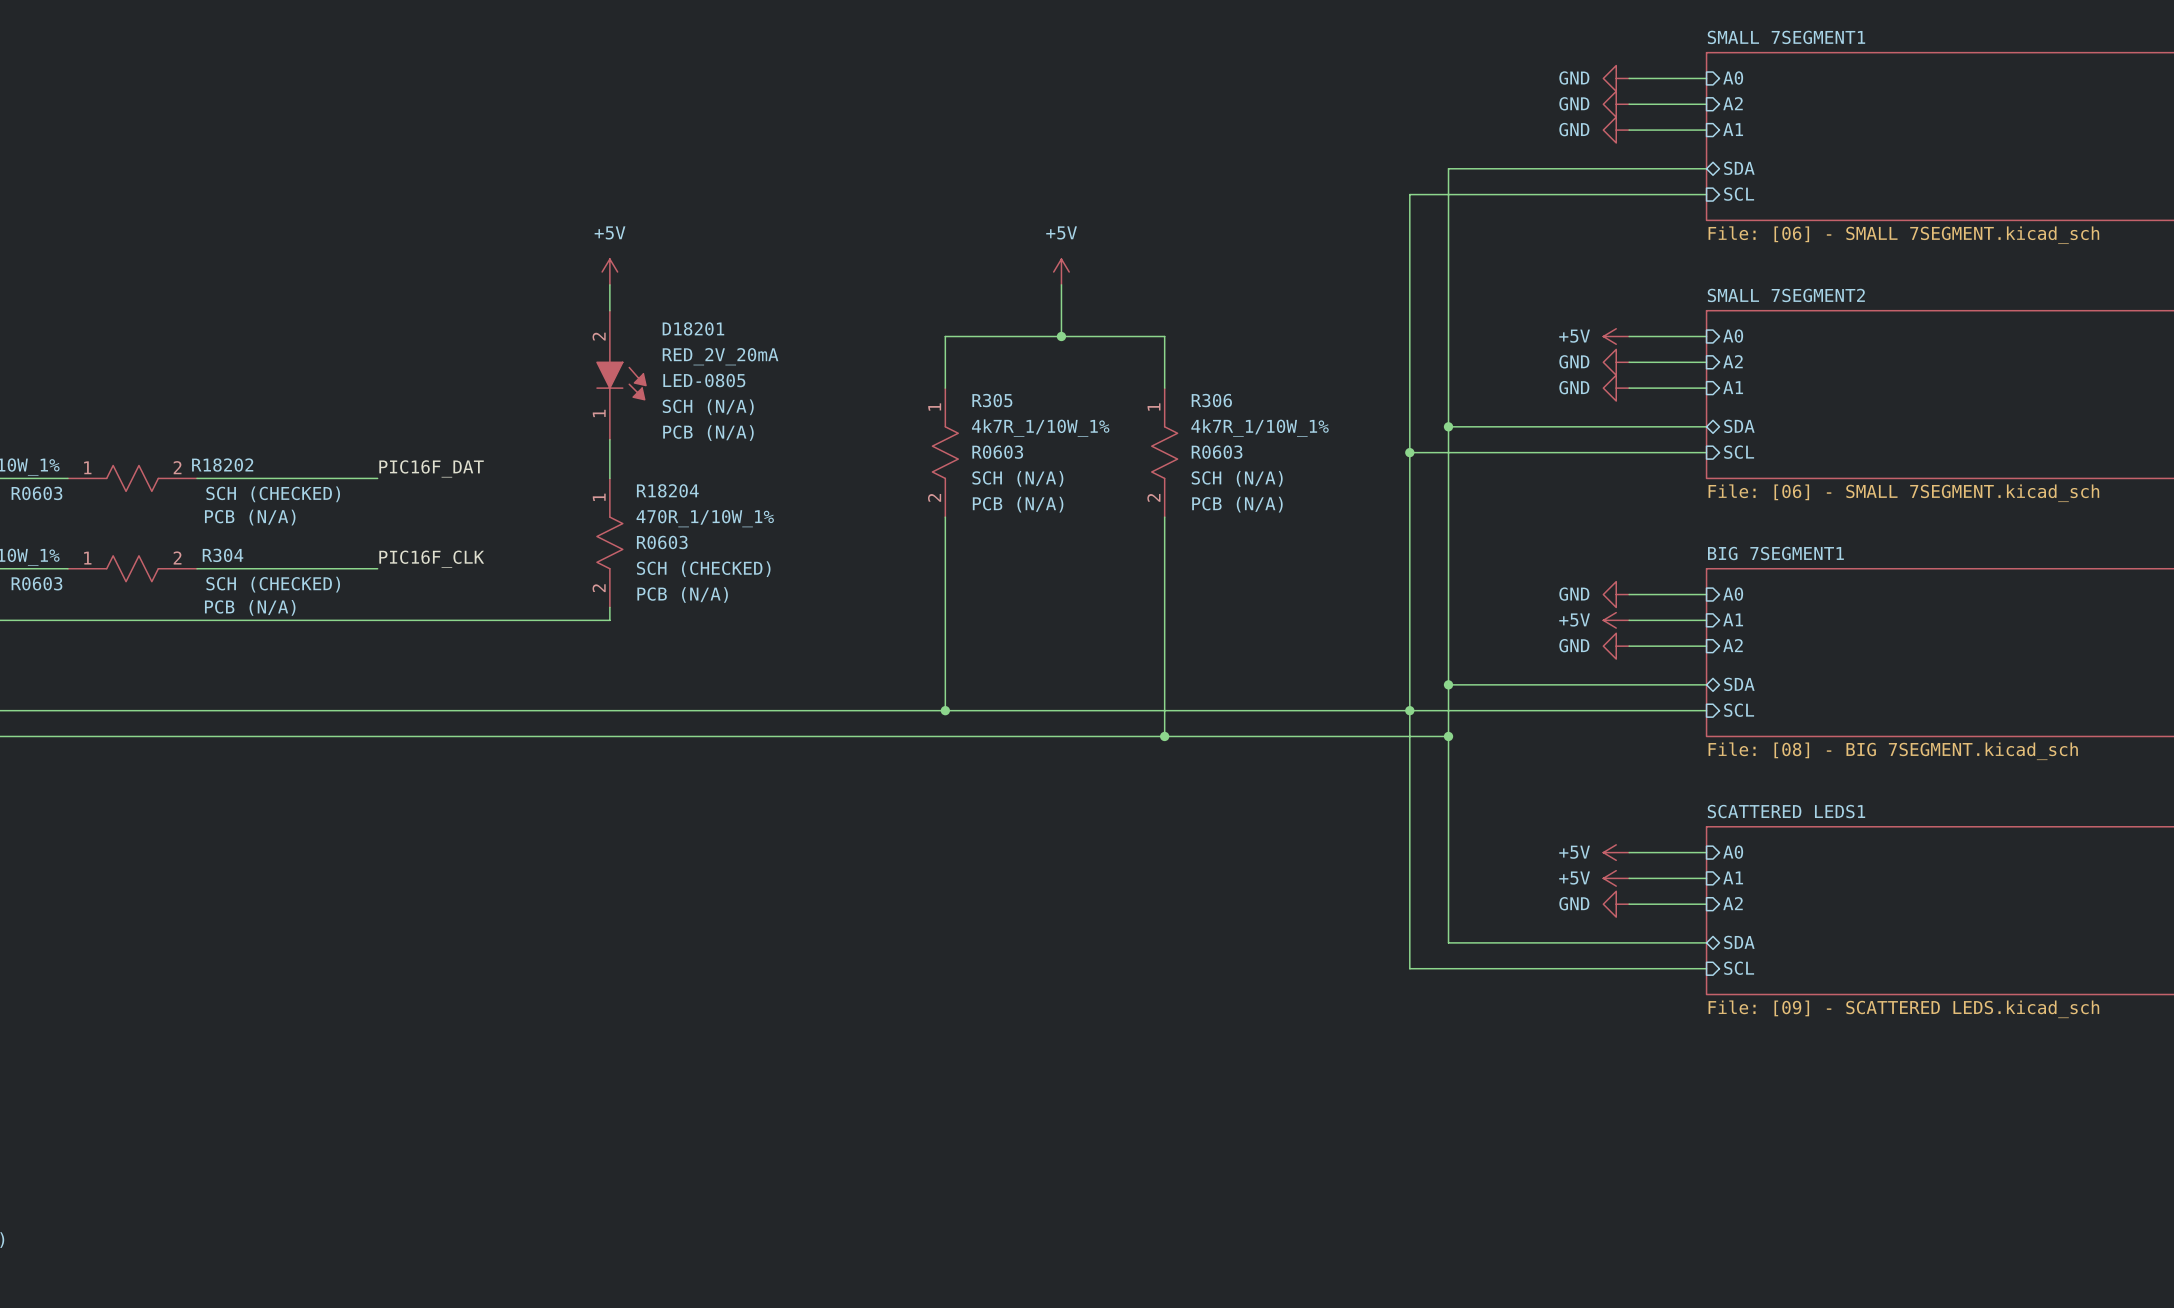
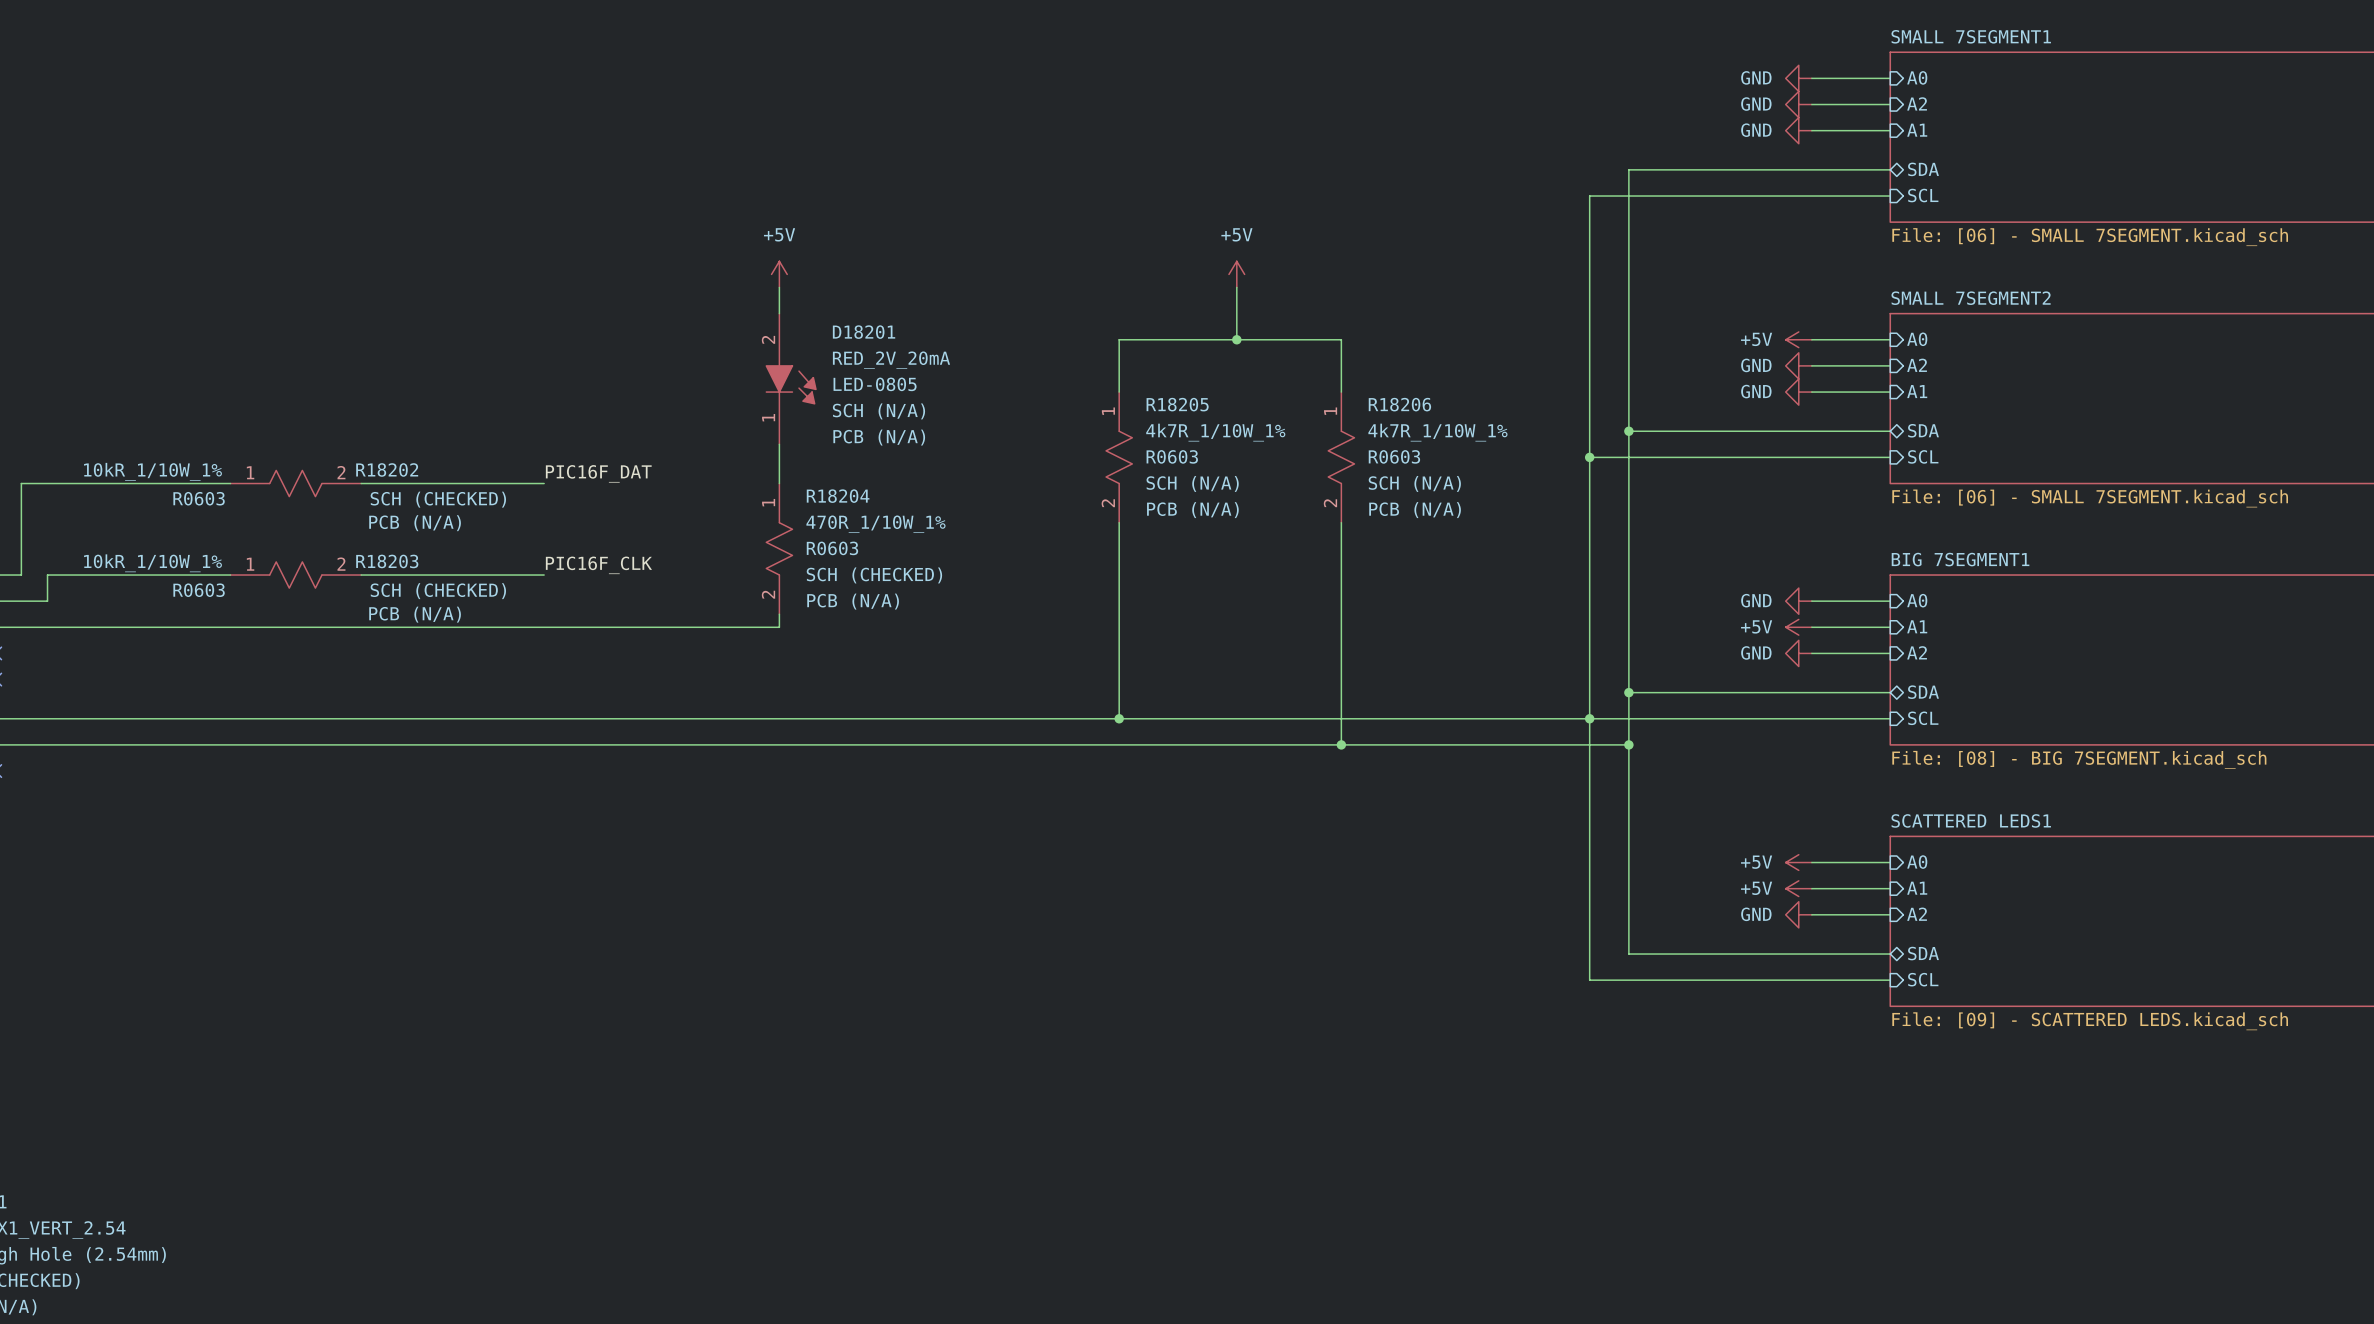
R305 name: R305 (992, 400) -> R18205 (1177, 404)
R306 name: R306 (1211, 400) -> R18206 (1399, 404)
R304 name: R304 (223, 555) -> R18203 (387, 561)

